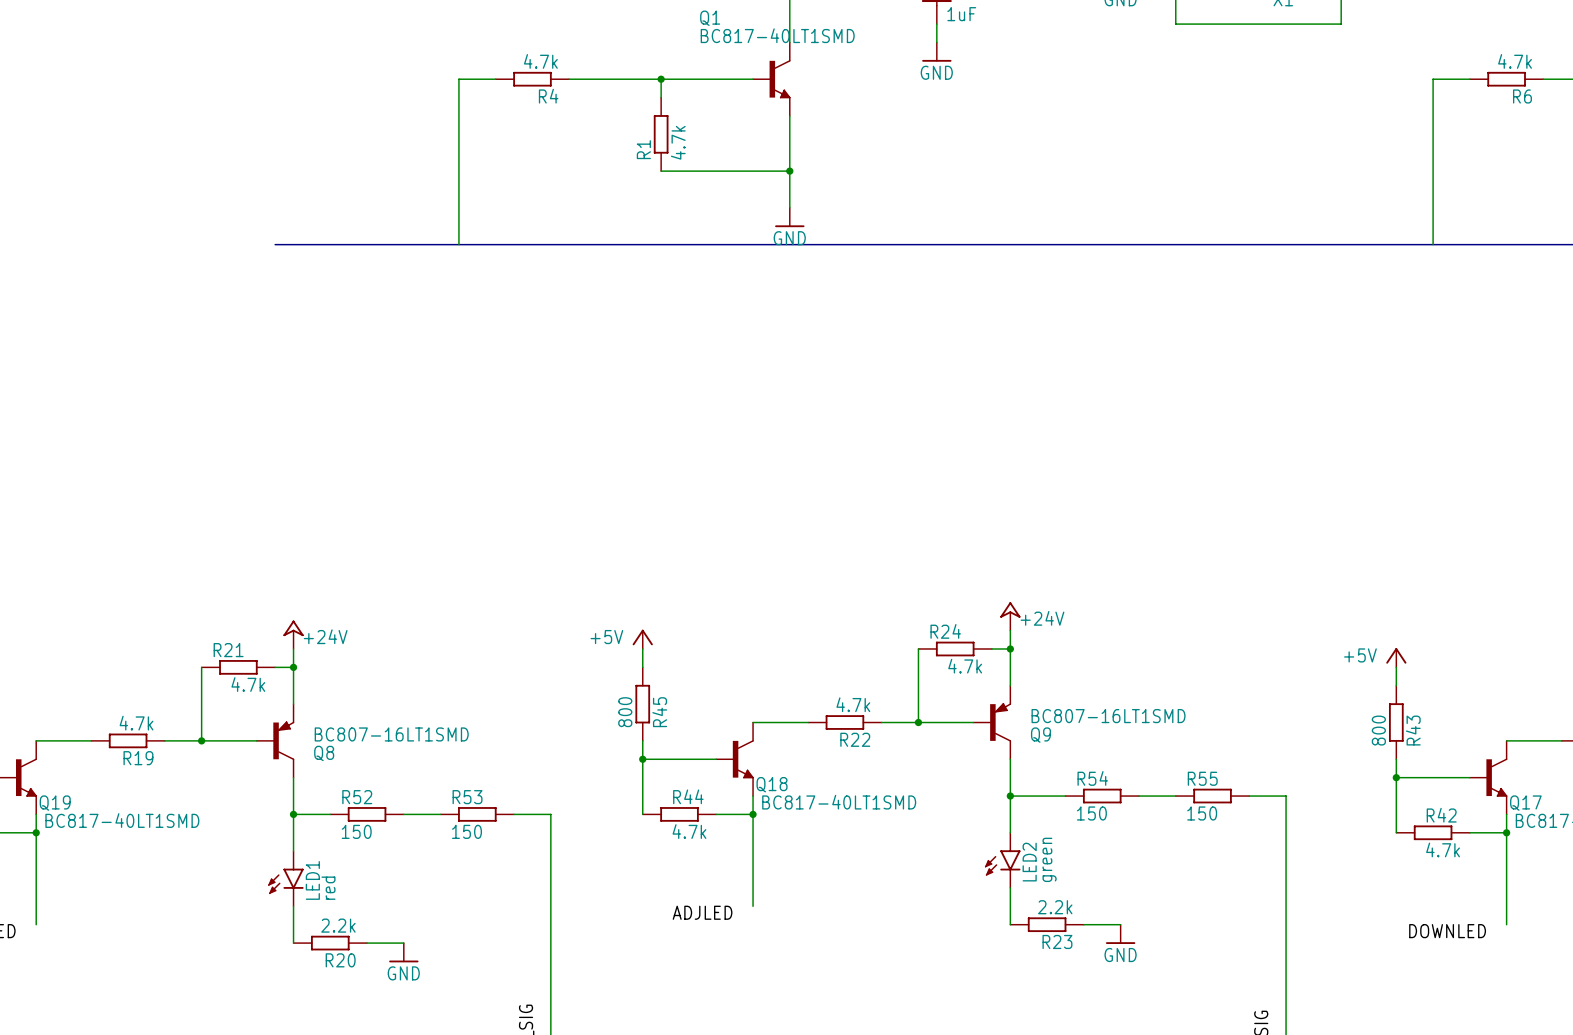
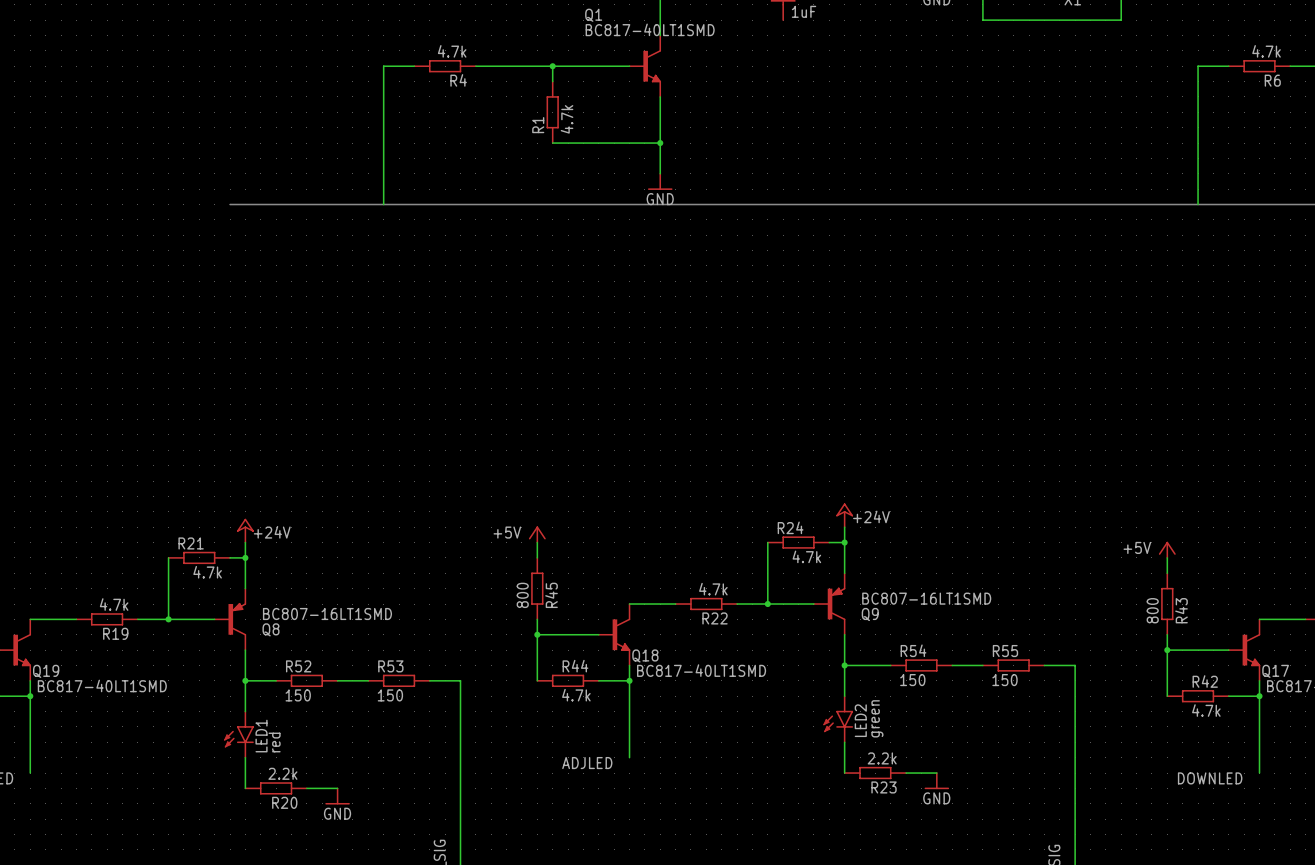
wire: (936, 24) (936, 42) -> none
power symbol: GND (936, 52) -> none

